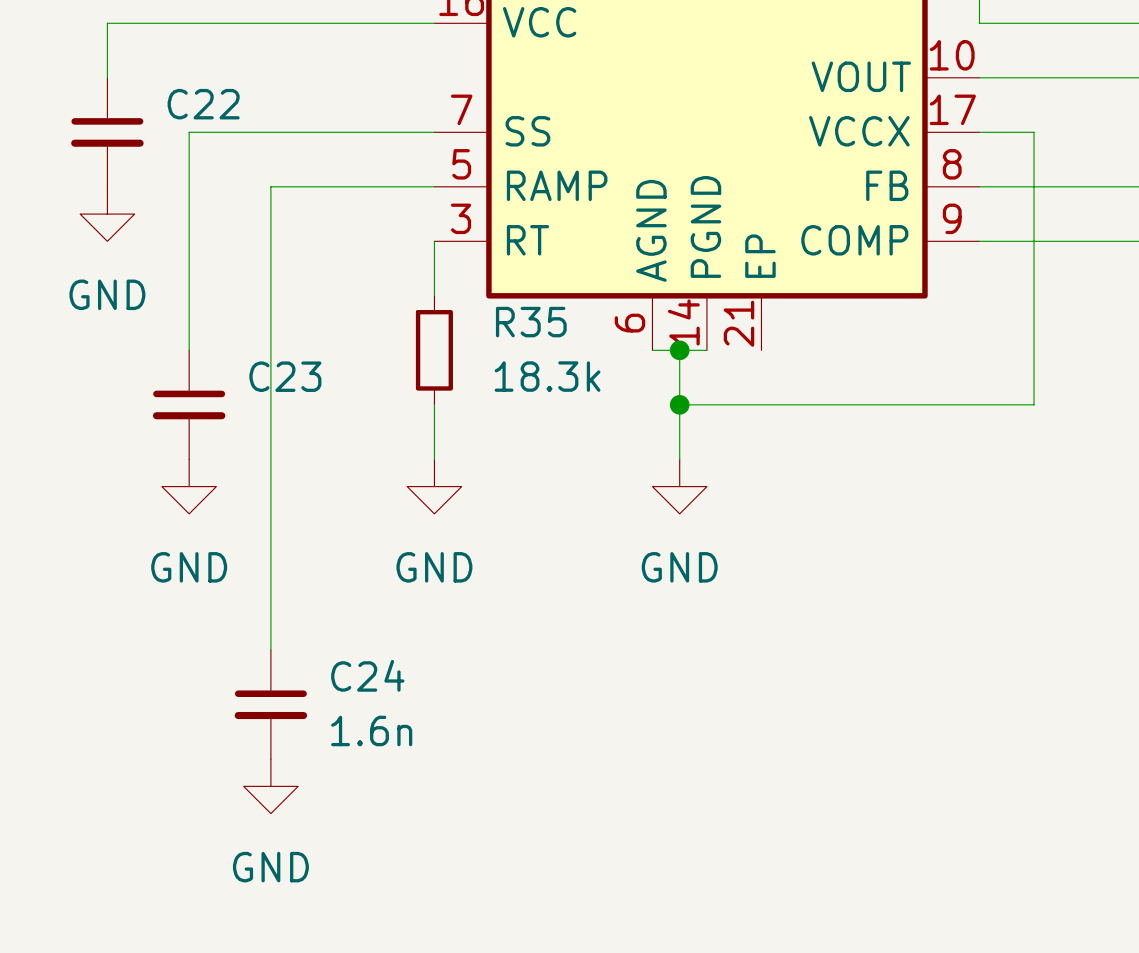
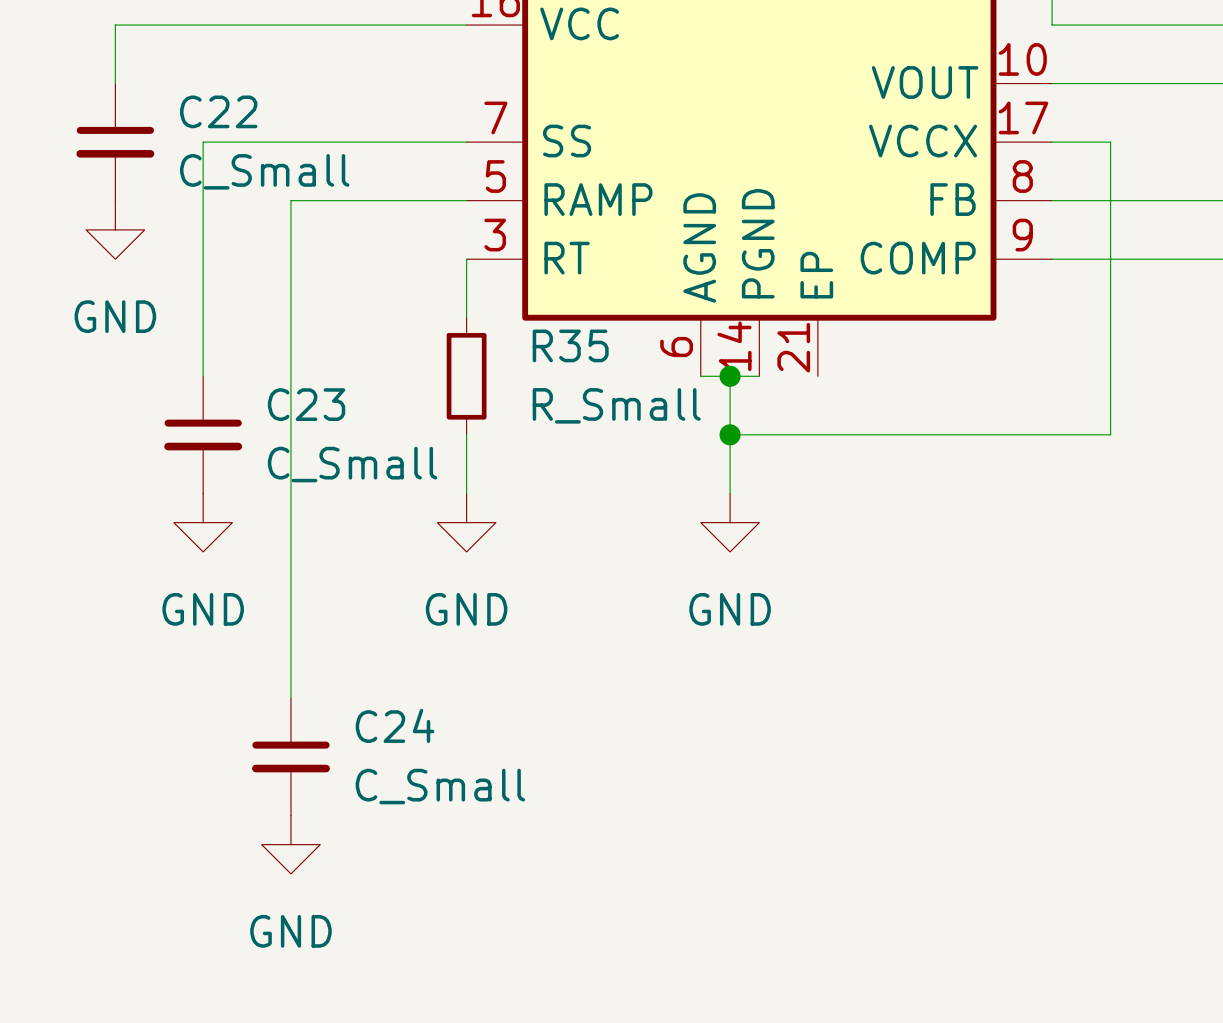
C22 value: none -> C_Small (264, 171)
R35 value: 18.3k (547, 376) -> R_Small (616, 405)
C23 value: none -> C_Small (352, 464)
C24 value: 1.6n (371, 730) -> C_Small (440, 786)

